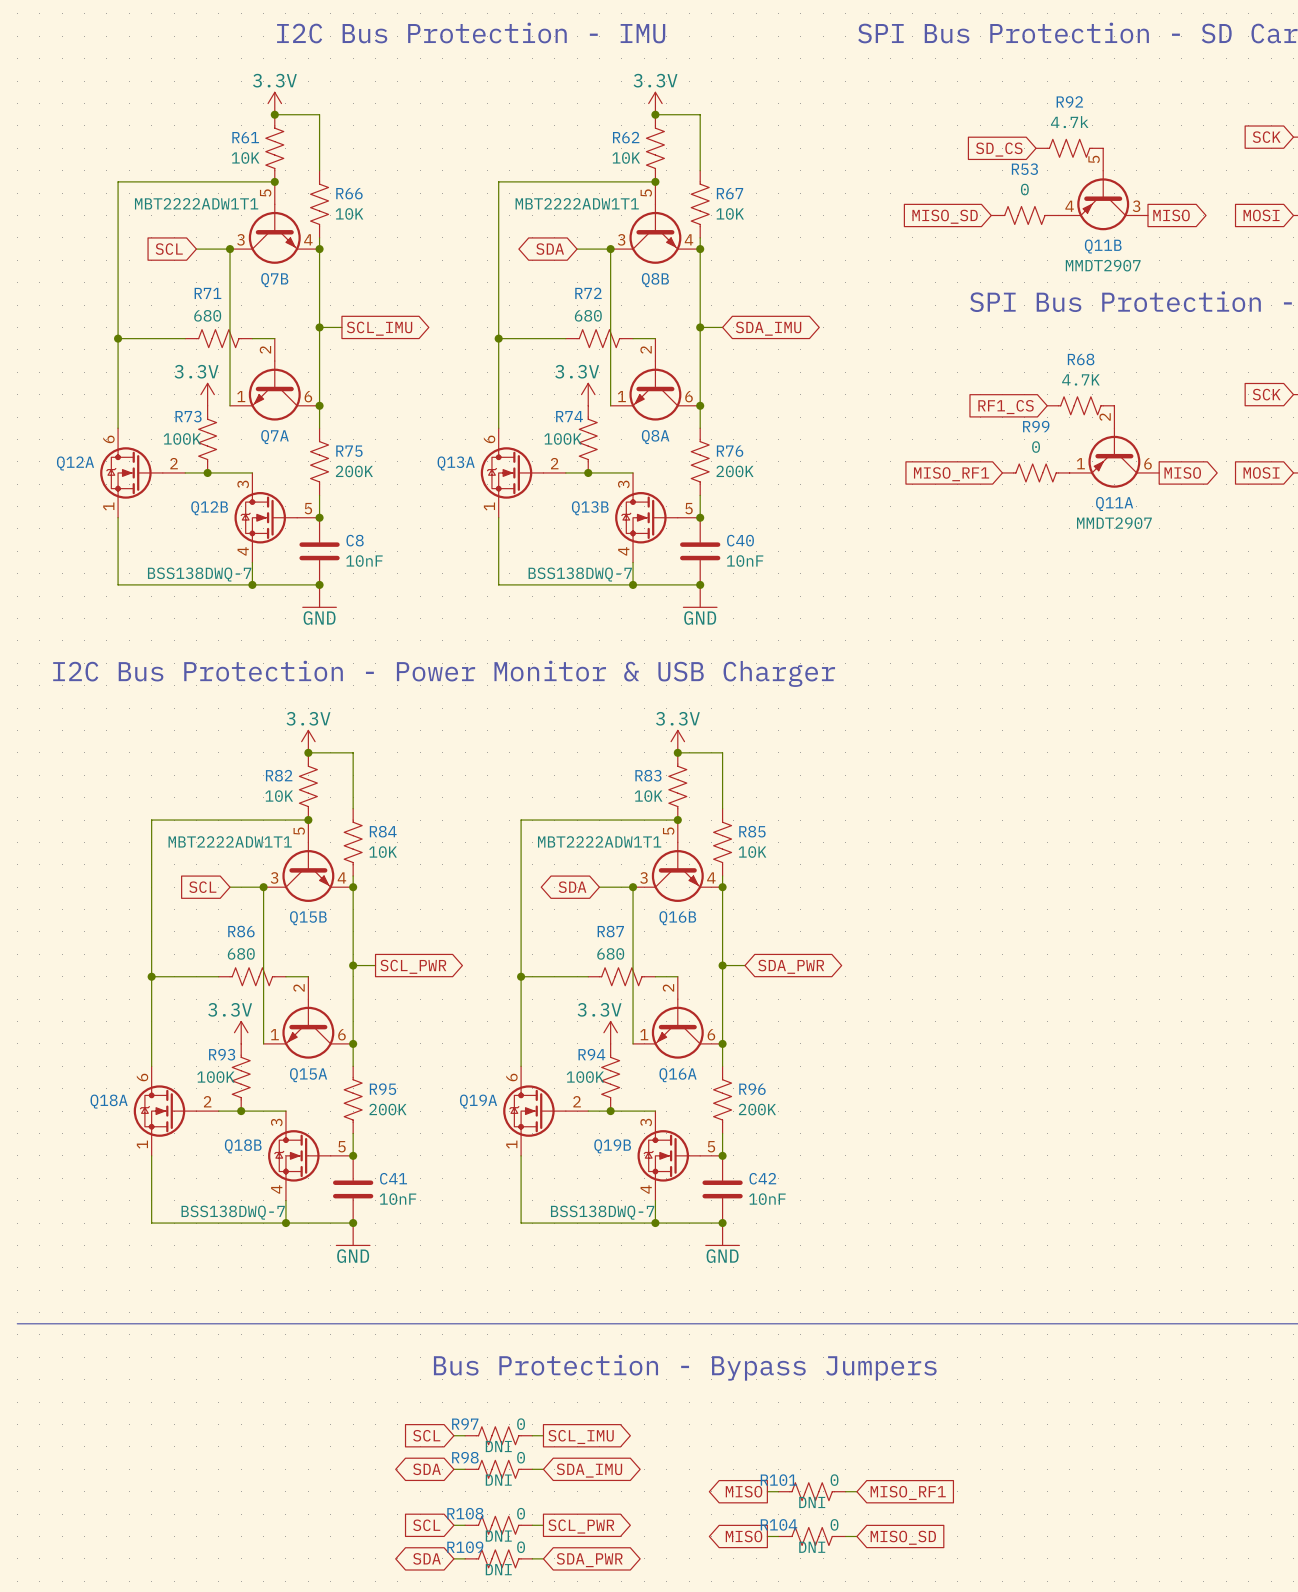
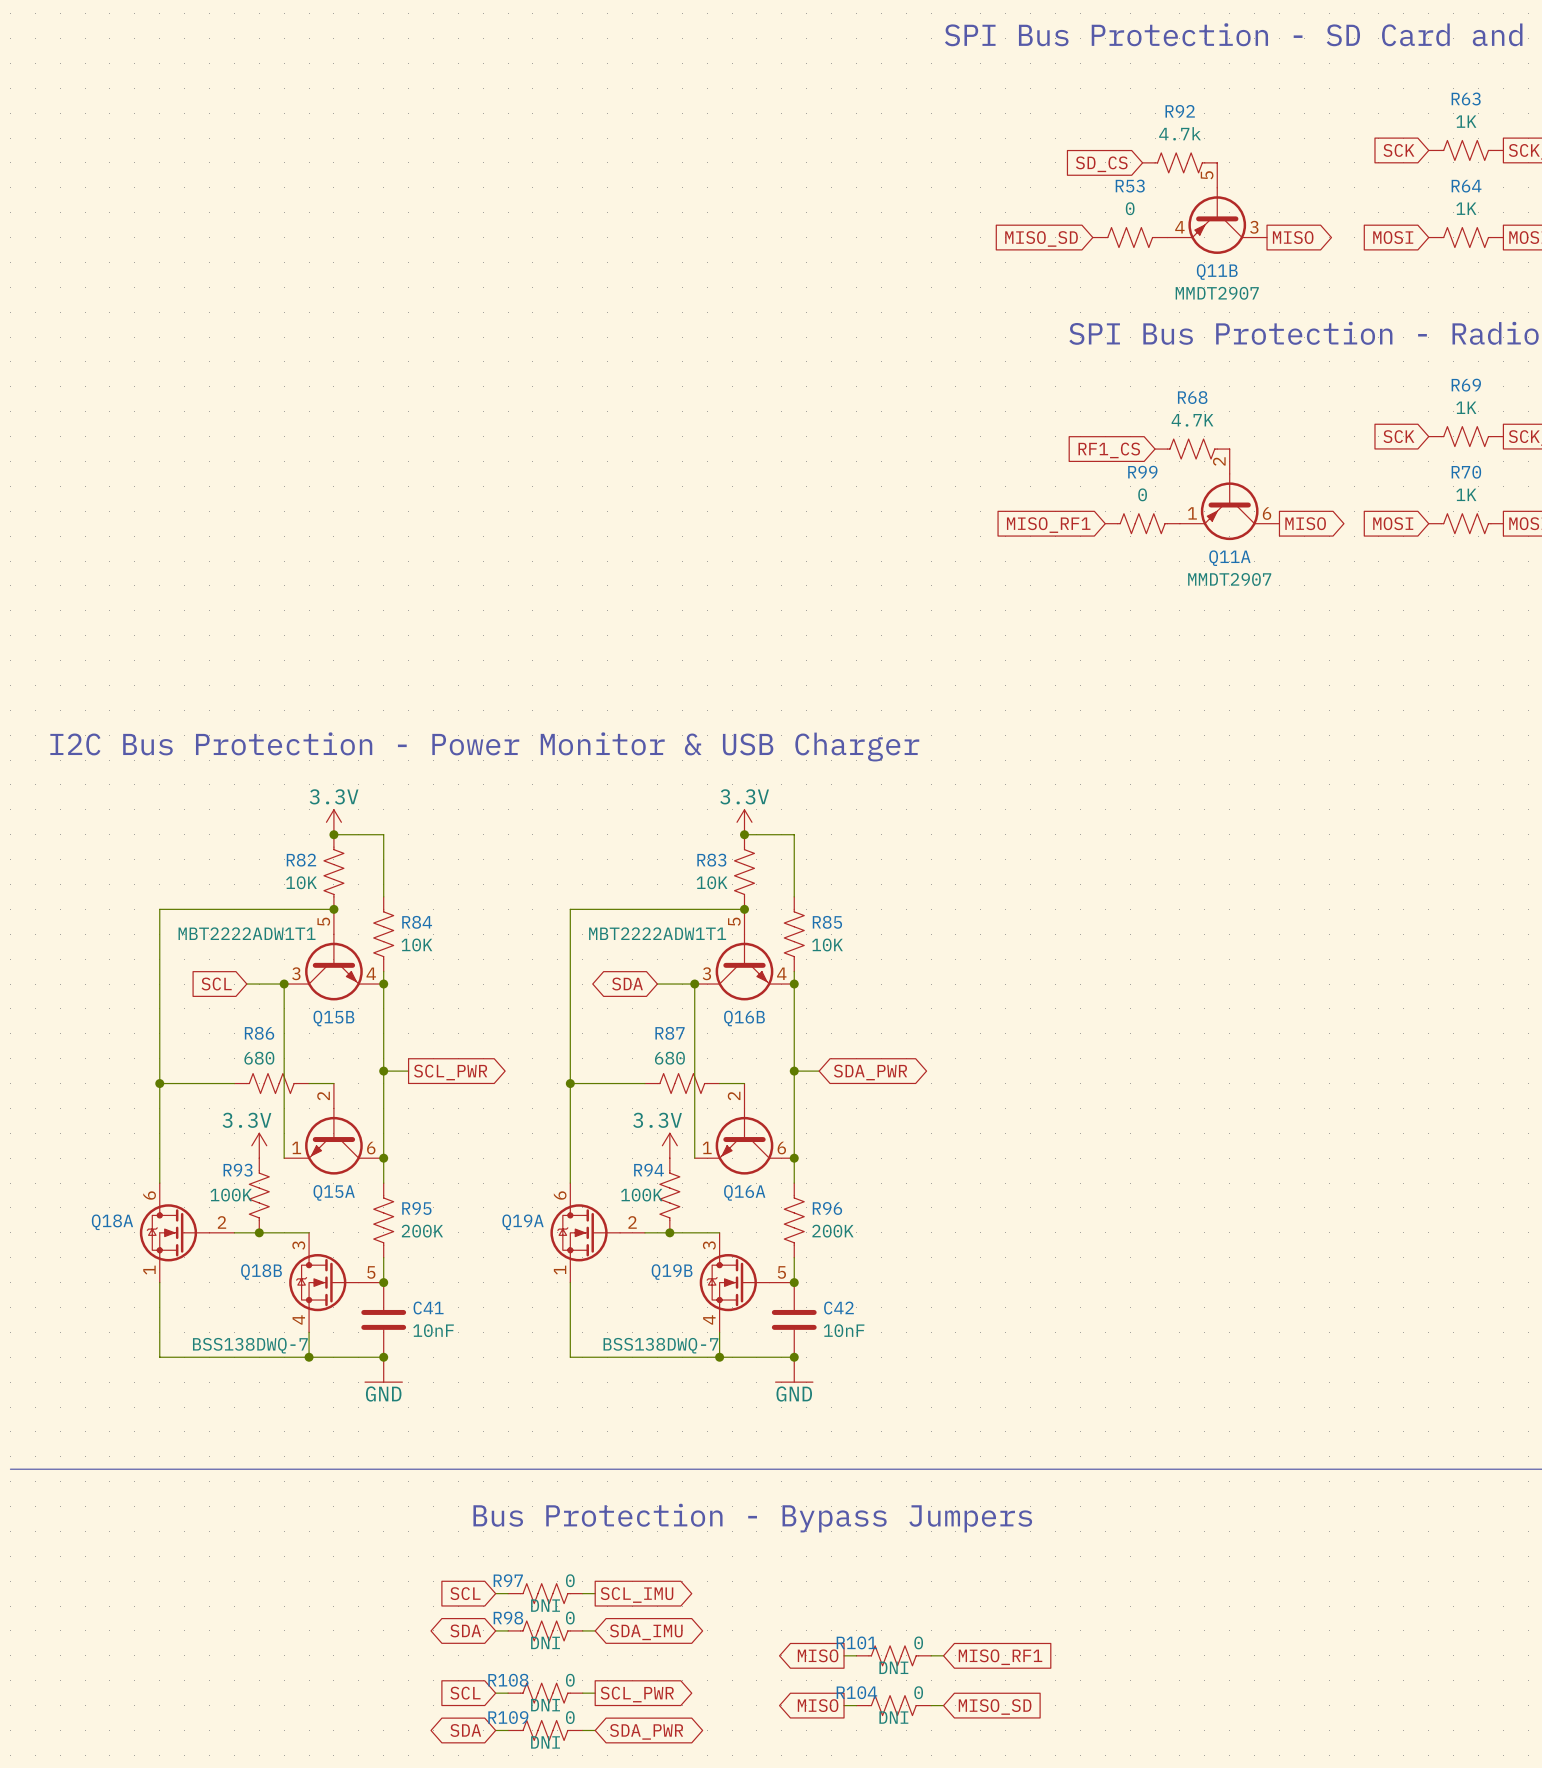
text: I2C Bus Protection - IMU (471, 33) -> none
power symbol: 3.3V (274, 103) -> none
power symbol: 3.3V (655, 103) -> none
wire: (274, 114) (319, 114) (319, 170) -> none
junction: (274, 114) -> none
wire: (655, 114) (700, 114) (700, 170) -> none
junction: (655, 114) -> none
R61: 10K (274, 148) -> none
R62: 10K (655, 148) -> none
wire: (274, 181) (118, 181) (118, 428) -> none
junction: (274, 181) -> none
wire: (655, 181) (498, 181) (498, 428) -> none
junction: (655, 181) -> none
R66: 10K (319, 204) -> none
R67: 10K (700, 204) -> none
Q7B: MBT2222ADW1T1 (274, 222) -> none
Q8B: MBT2222ADW1T1 (655, 222) -> none
wire: (319, 237) (319, 428) -> none
wire: (700, 237) (700, 428) -> none
global label: SCL (169, 249) -> none
wire: (196, 249) (230, 249) (230, 405) -> none
junction: (230, 249) -> none
junction: (319, 249) -> none
global label: SDA (550, 249) -> none
wire: (577, 249) (610, 249) (610, 405) -> none
junction: (610, 249) -> none
junction: (700, 249) -> none
wire: (319, 327) (341, 327) -> none
junction: (319, 327) -> none
wire: (700, 327) (722, 327) -> none
junction: (700, 327) -> none
global label: SCL_IMU (379, 328) -> none
global label: SDA_IMU (768, 328) -> none
wire: (118, 338) (185, 338) -> none
junction: (118, 338) -> none
R71: 680 (218, 338) -> none
wire: (252, 338) (274, 338) -> none
wire: (498, 338) (565, 338) -> none
junction: (498, 338) -> none
R72: 680 (599, 338) -> none
wire: (633, 338) (655, 338) -> none
Q7A: (274, 379) -> none
Q8A: (655, 379) -> none
power symbol: 3.3V (207, 394) -> none
power symbol: 3.3V (588, 394) -> none
junction: (319, 405) -> none
junction: (700, 405) -> none
R73: 100K (207, 439) -> none
R74: 100K (588, 439) -> none
R75: 200K (319, 461) -> none
R76: 200K (700, 461) -> none
Q12A: BSS138DWQ-7 (142, 472) -> none
wire: (185, 472) (252, 472) -> none
junction: (207, 472) -> none
Q13A: BSS138DWQ-7 (523, 472) -> none
wire: (565, 472) (633, 472) -> none
junction: (588, 472) -> none
wire: (319, 495) (319, 517) -> none
wire: (700, 495) (700, 517) -> none
wire: (118, 517) (118, 584) (319, 584) -> none
Q12B: (277, 517) -> none
junction: (319, 517) -> none
wire: (498, 517) (498, 584) (700, 584) -> none
Q13B: (657, 517) -> none
junction: (700, 517) -> none
C8: 10nF (319, 551) -> none
C40: 10nF (700, 551) -> none
wire: (252, 562) (252, 584) -> none
wire: (633, 562) (633, 584) -> none
junction: (252, 584) -> none
junction: (319, 584) -> none
junction: (633, 584) -> none
junction: (700, 584) -> none
power symbol: GND (319, 596) -> none
power symbol: GND (700, 596) -> none

